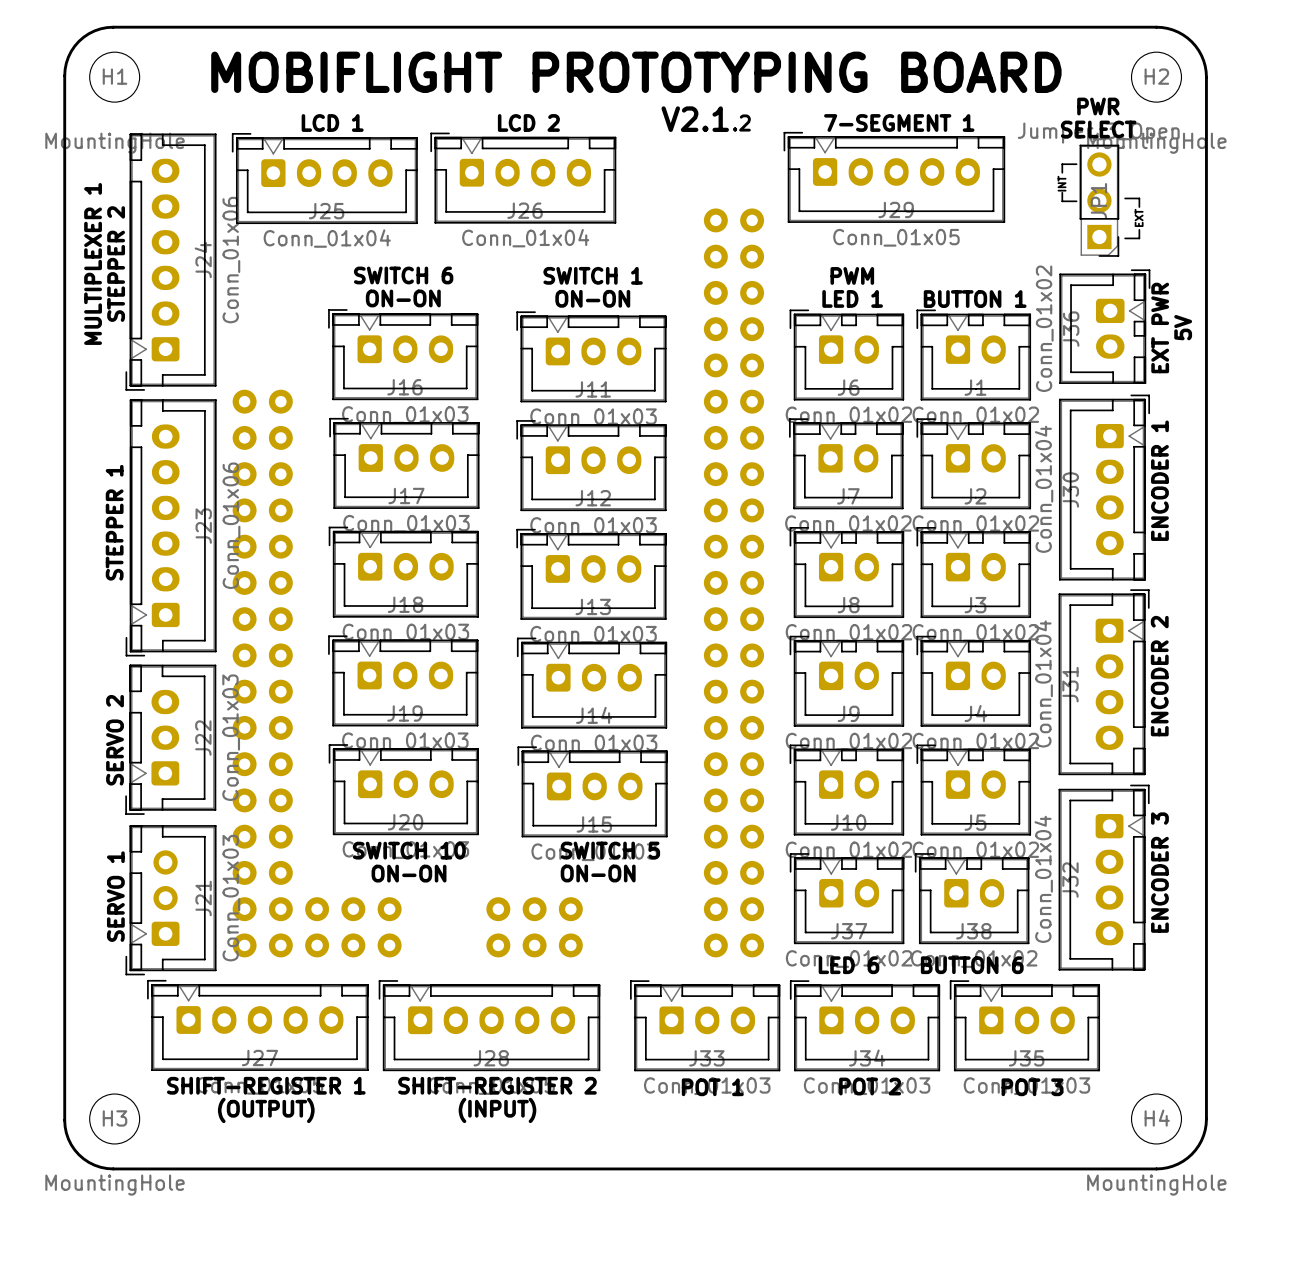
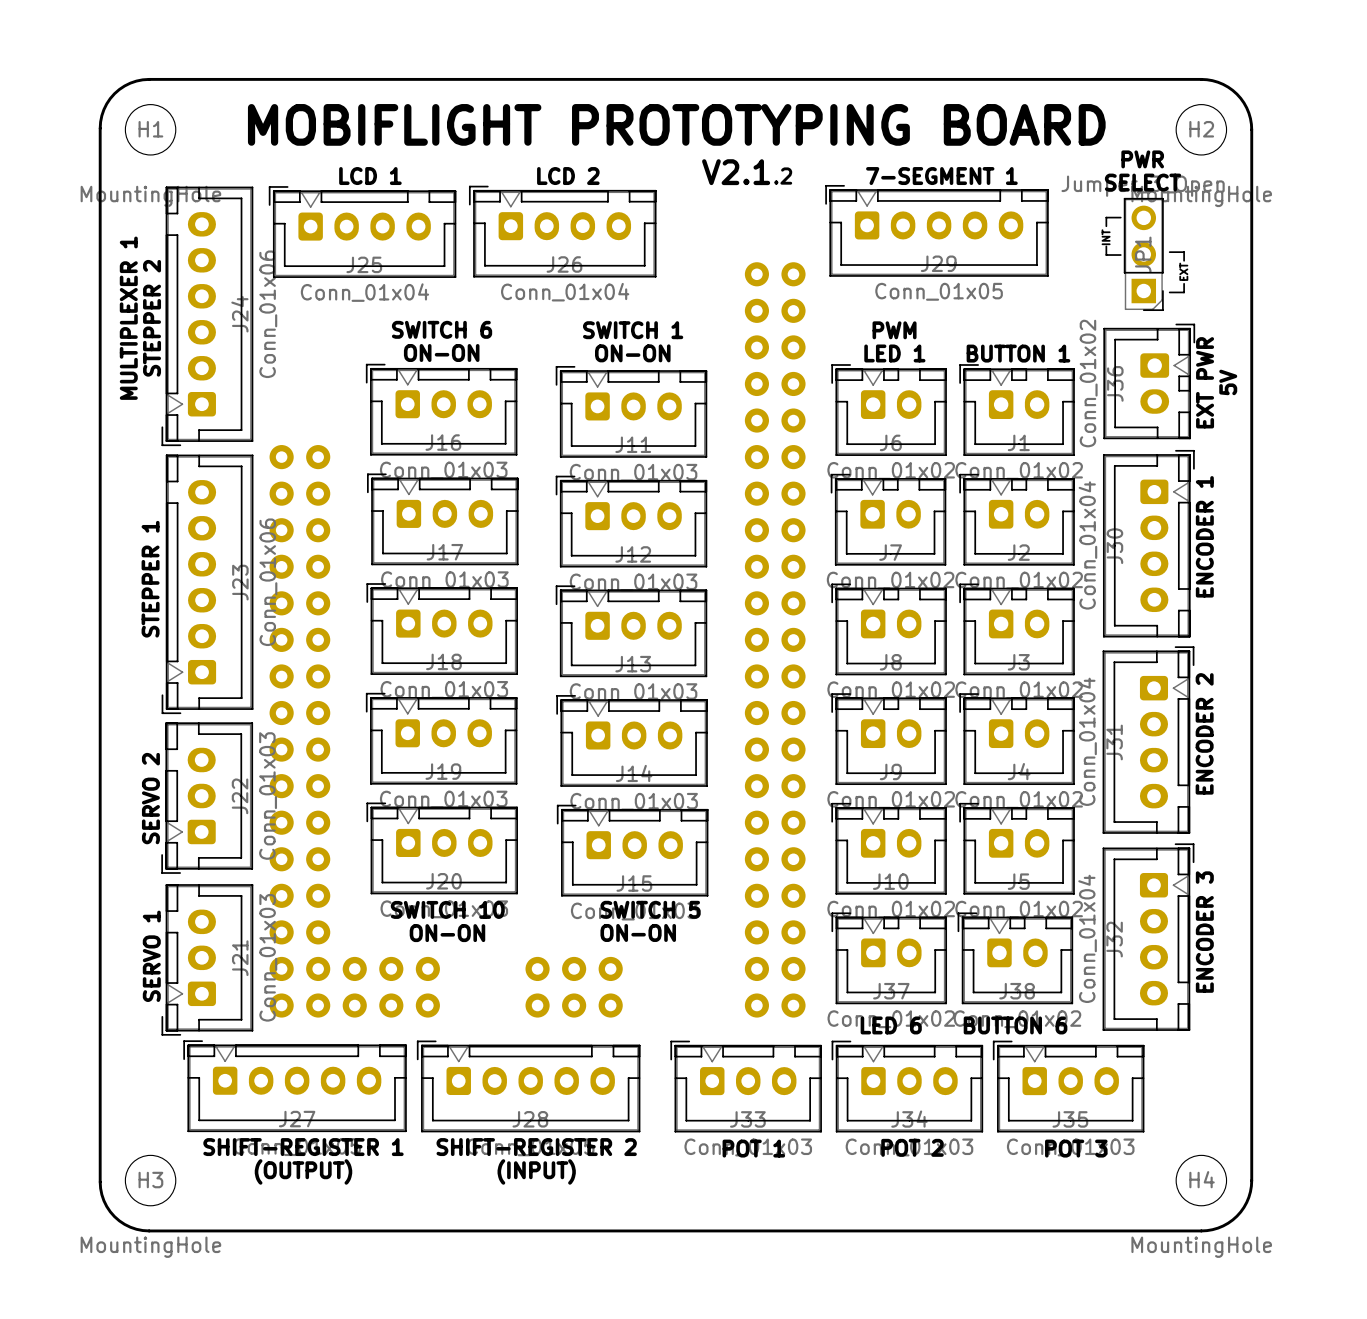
J21 footprint: [125, 825, 217, 976] -> [161, 884, 254, 1036]

